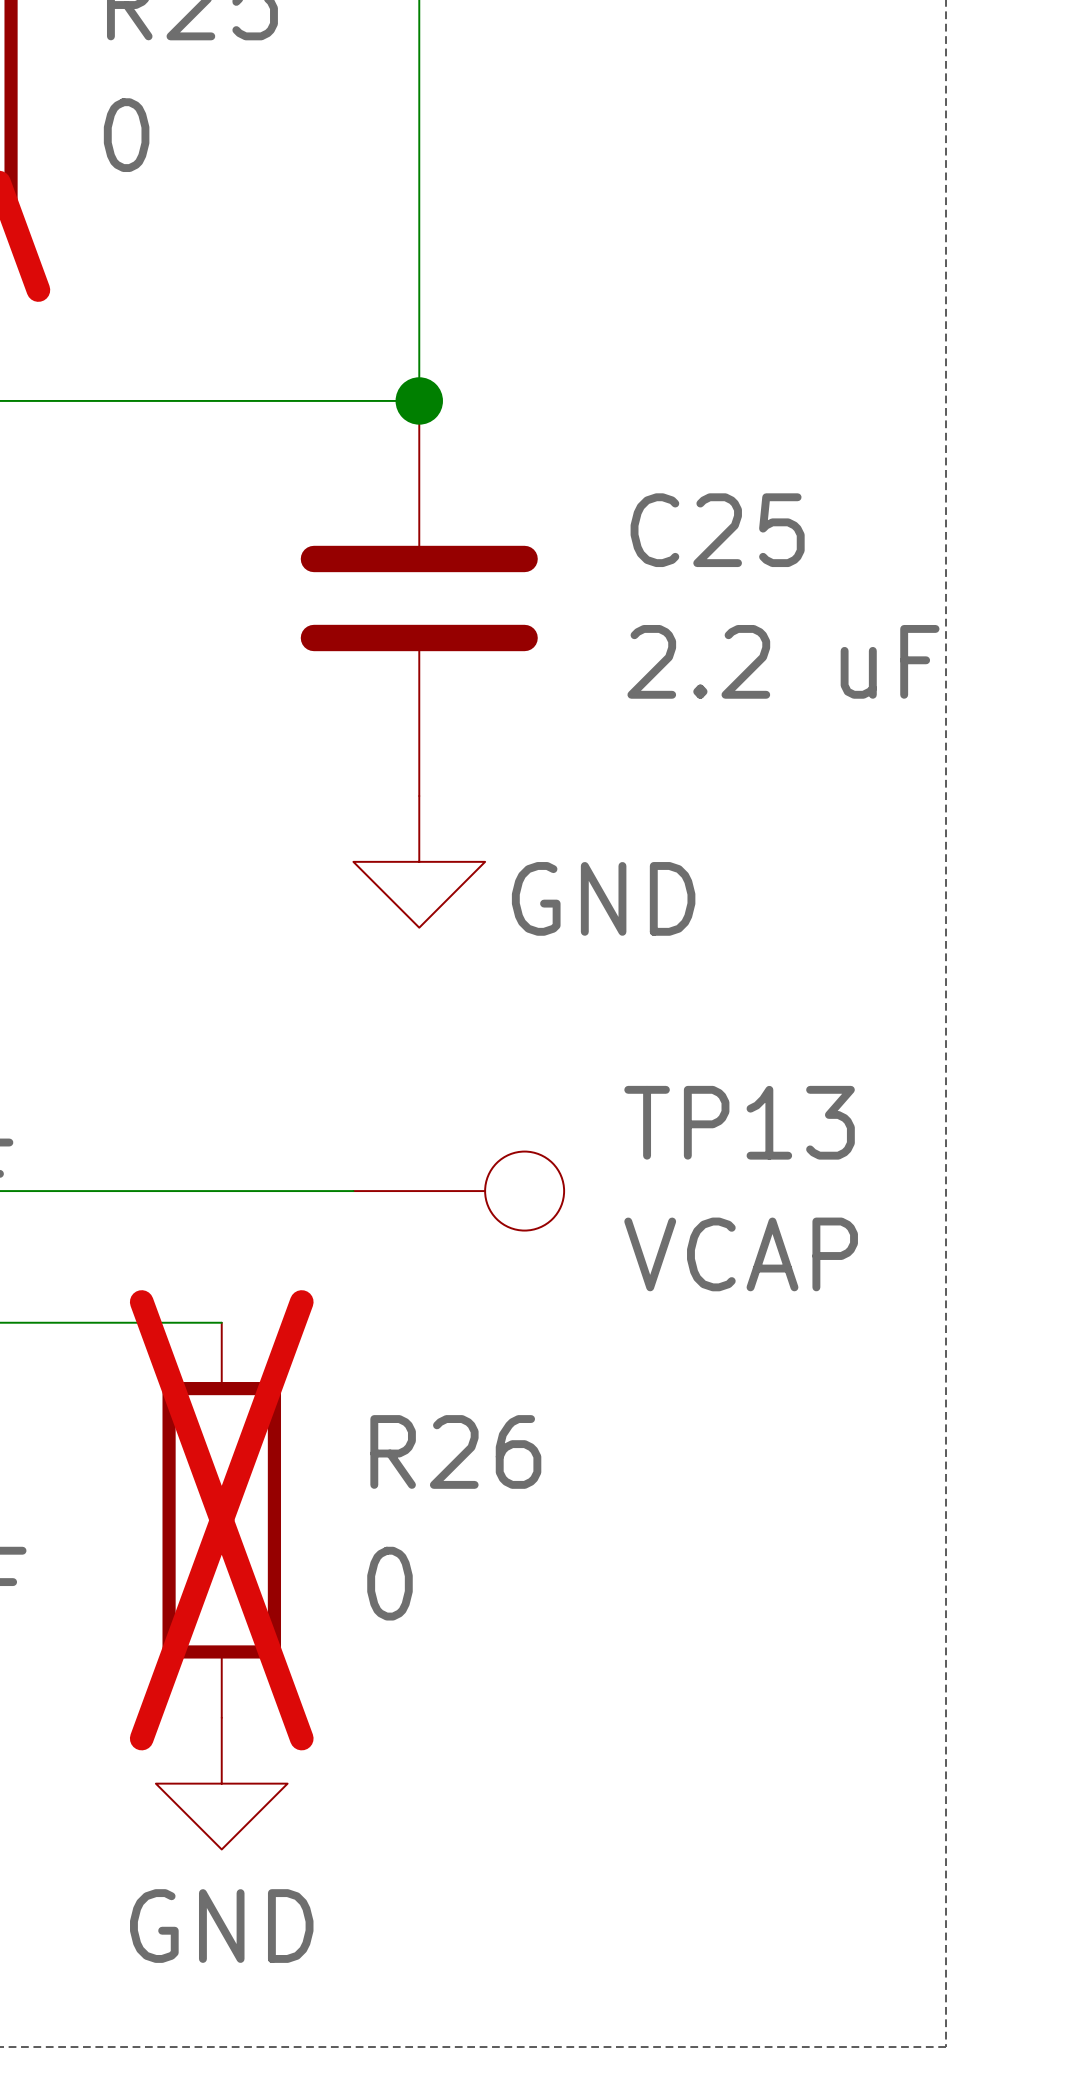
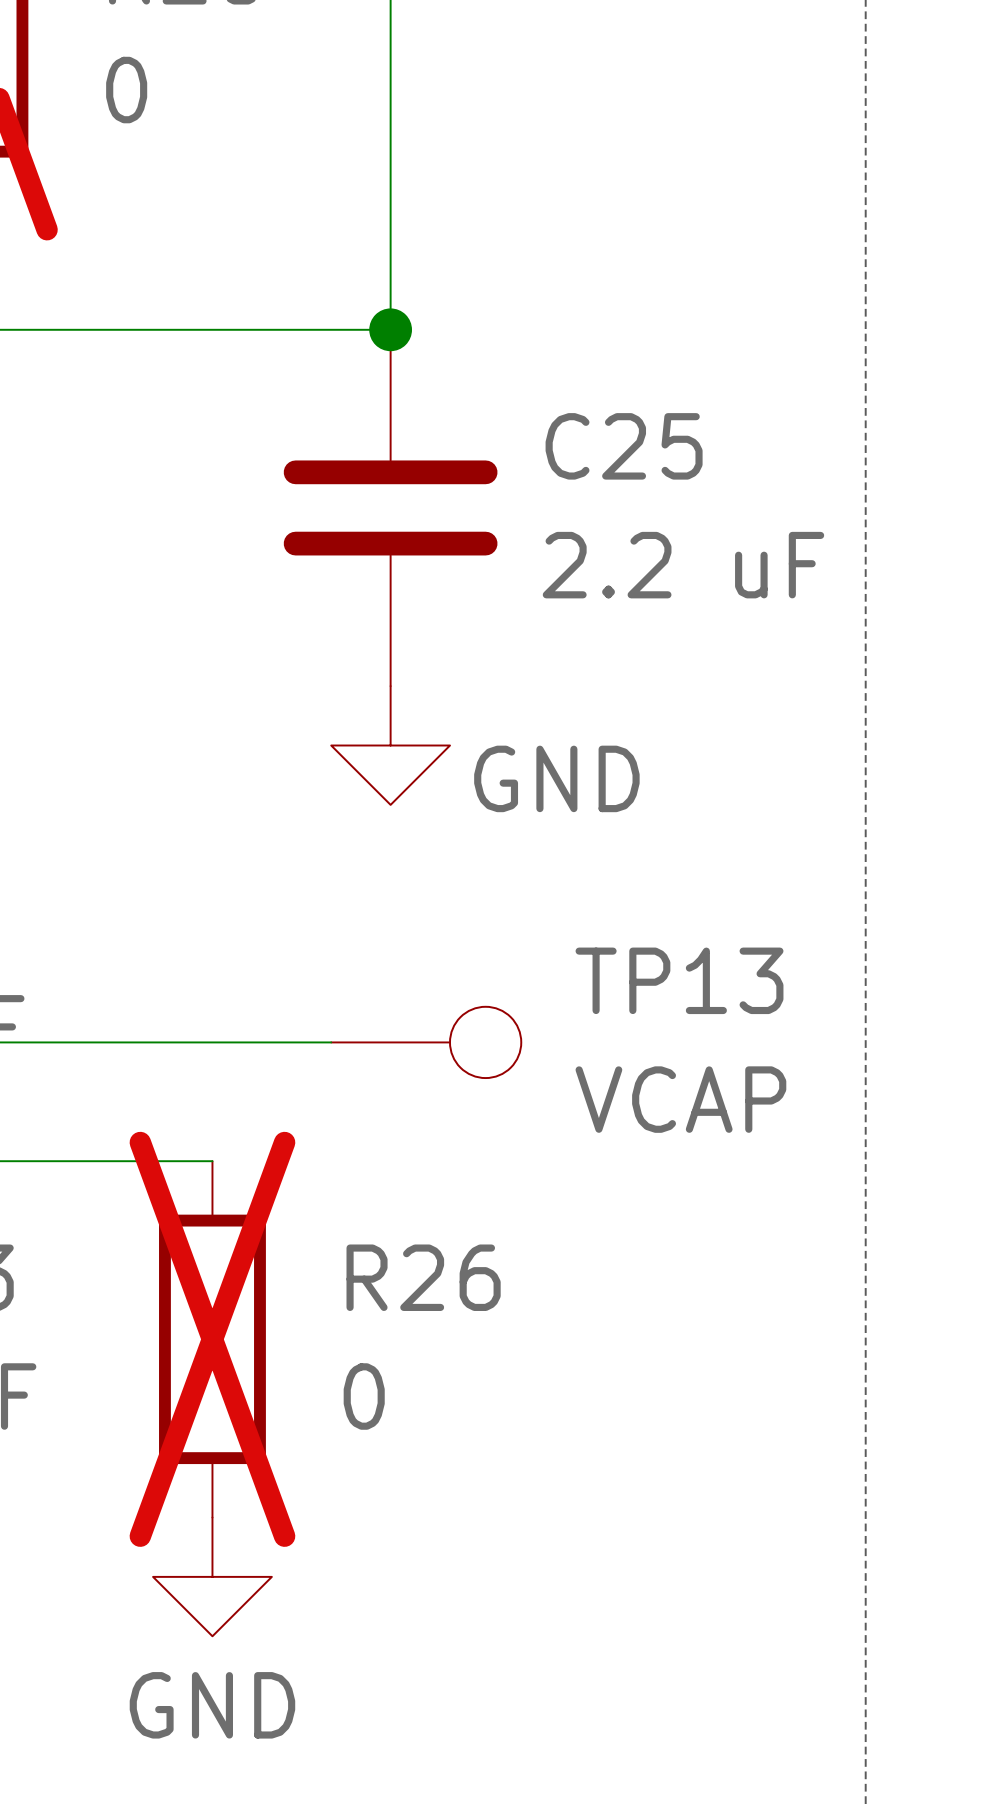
C25 name position: C25 (717, 530) -> C25 (624, 446)
C25 value position: 2.2 uF (783, 661) -> 2.2 uF (683, 565)

